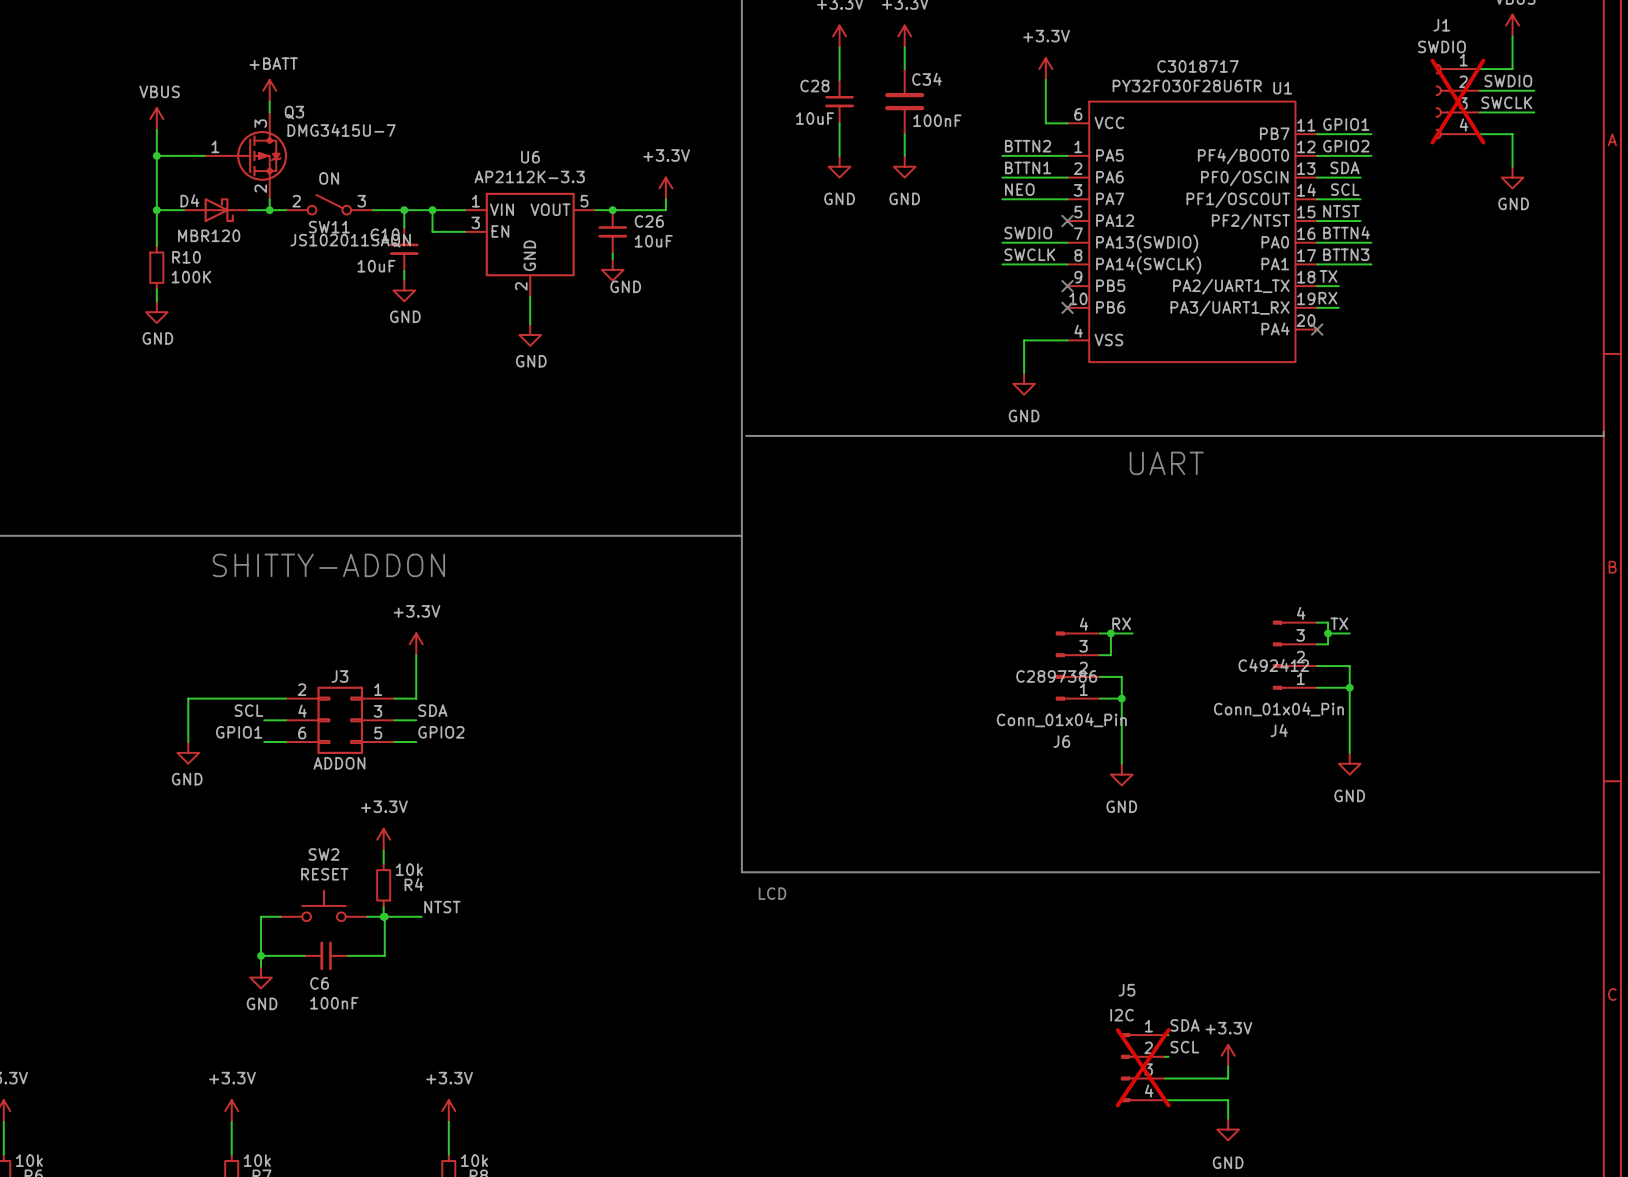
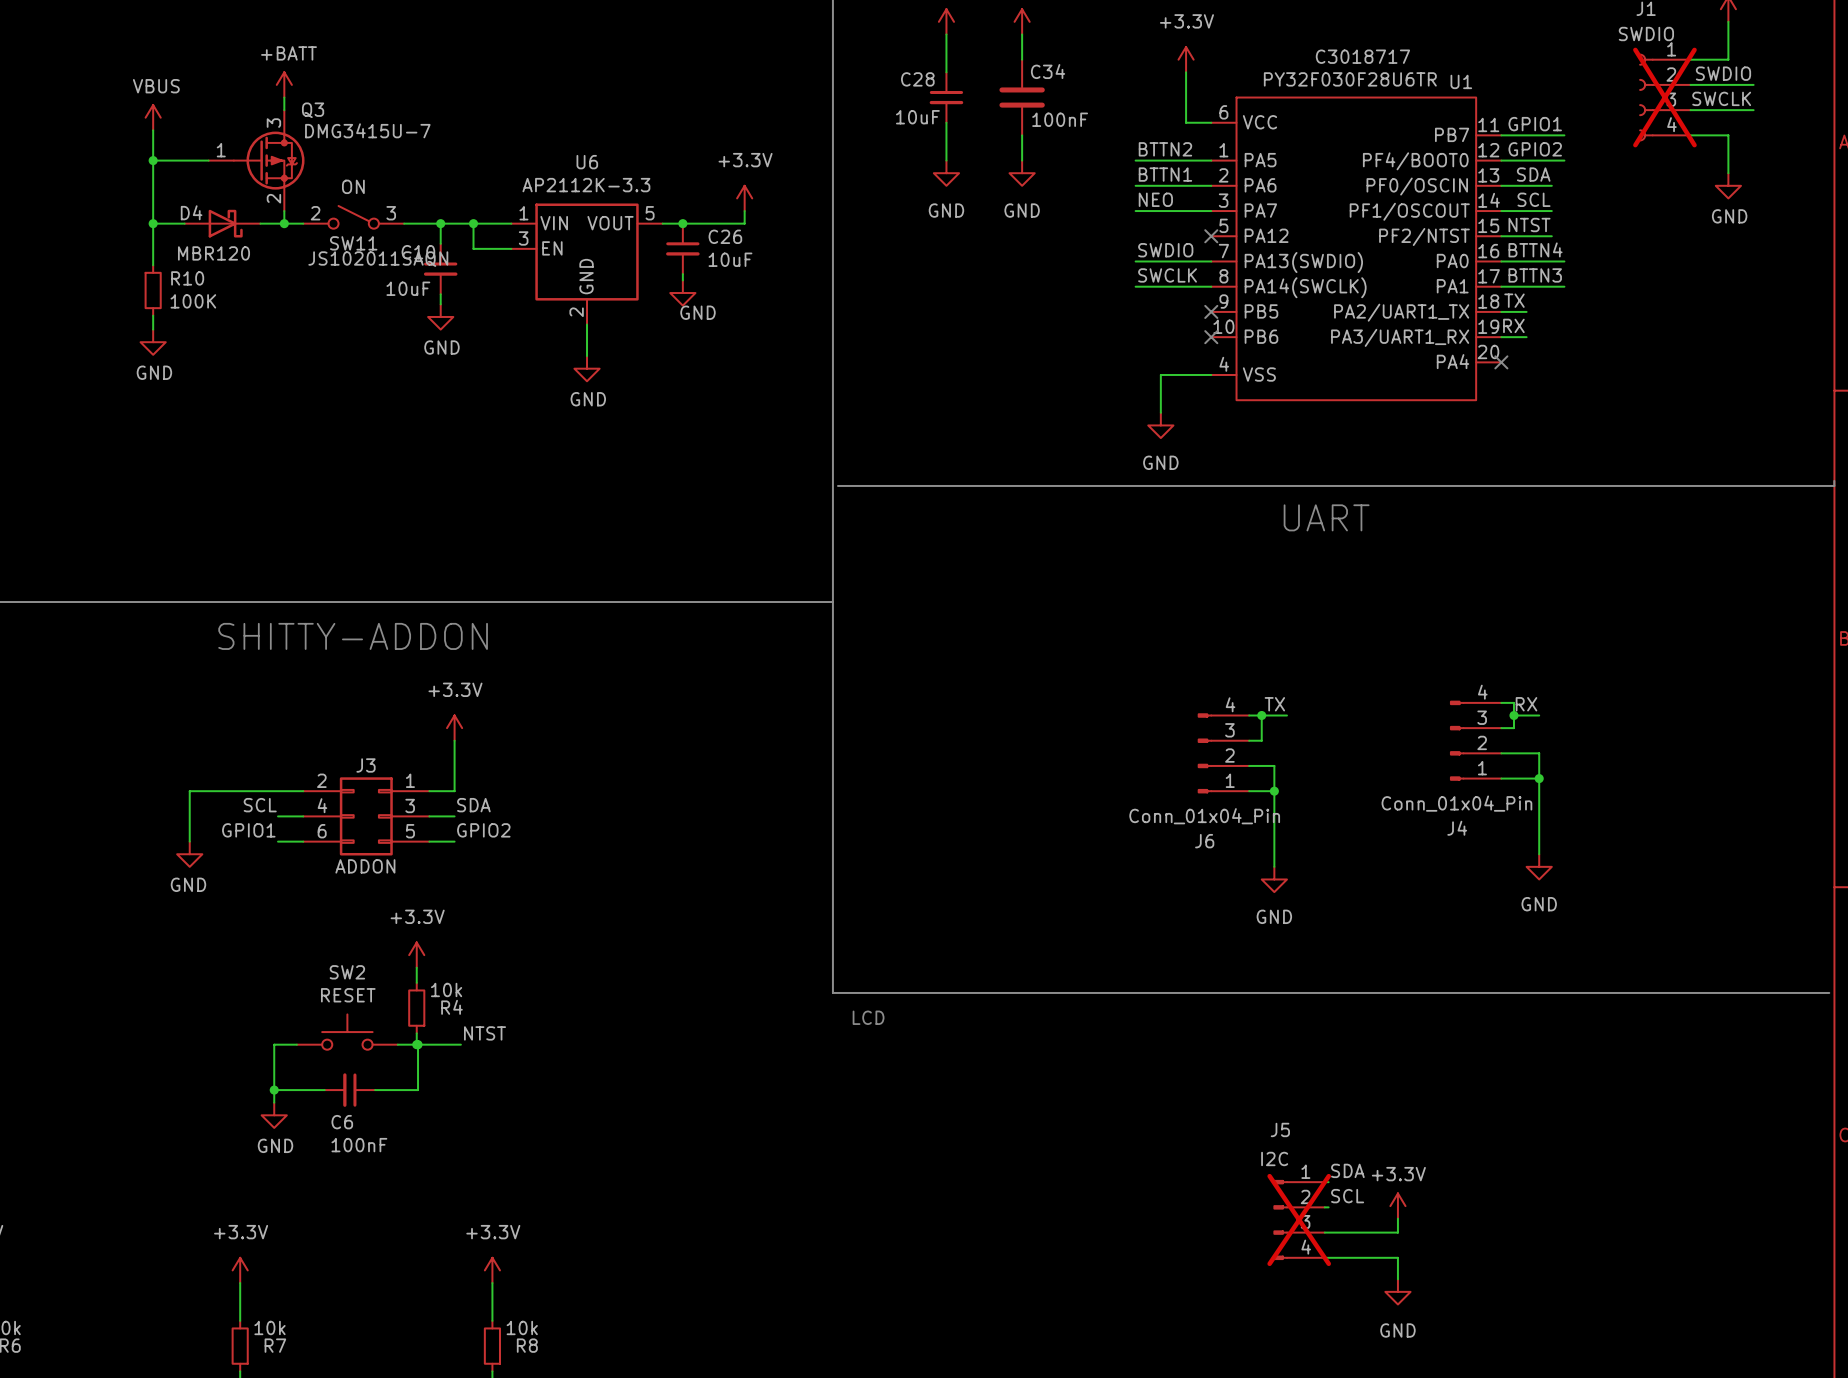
label: RX (1121, 623) -> TX (1274, 704)
label: TX (1339, 623) -> RX (1526, 704)
J4 text: C492412 (1273, 665) -> none
J6 text: C2897386 (1056, 676) -> none

